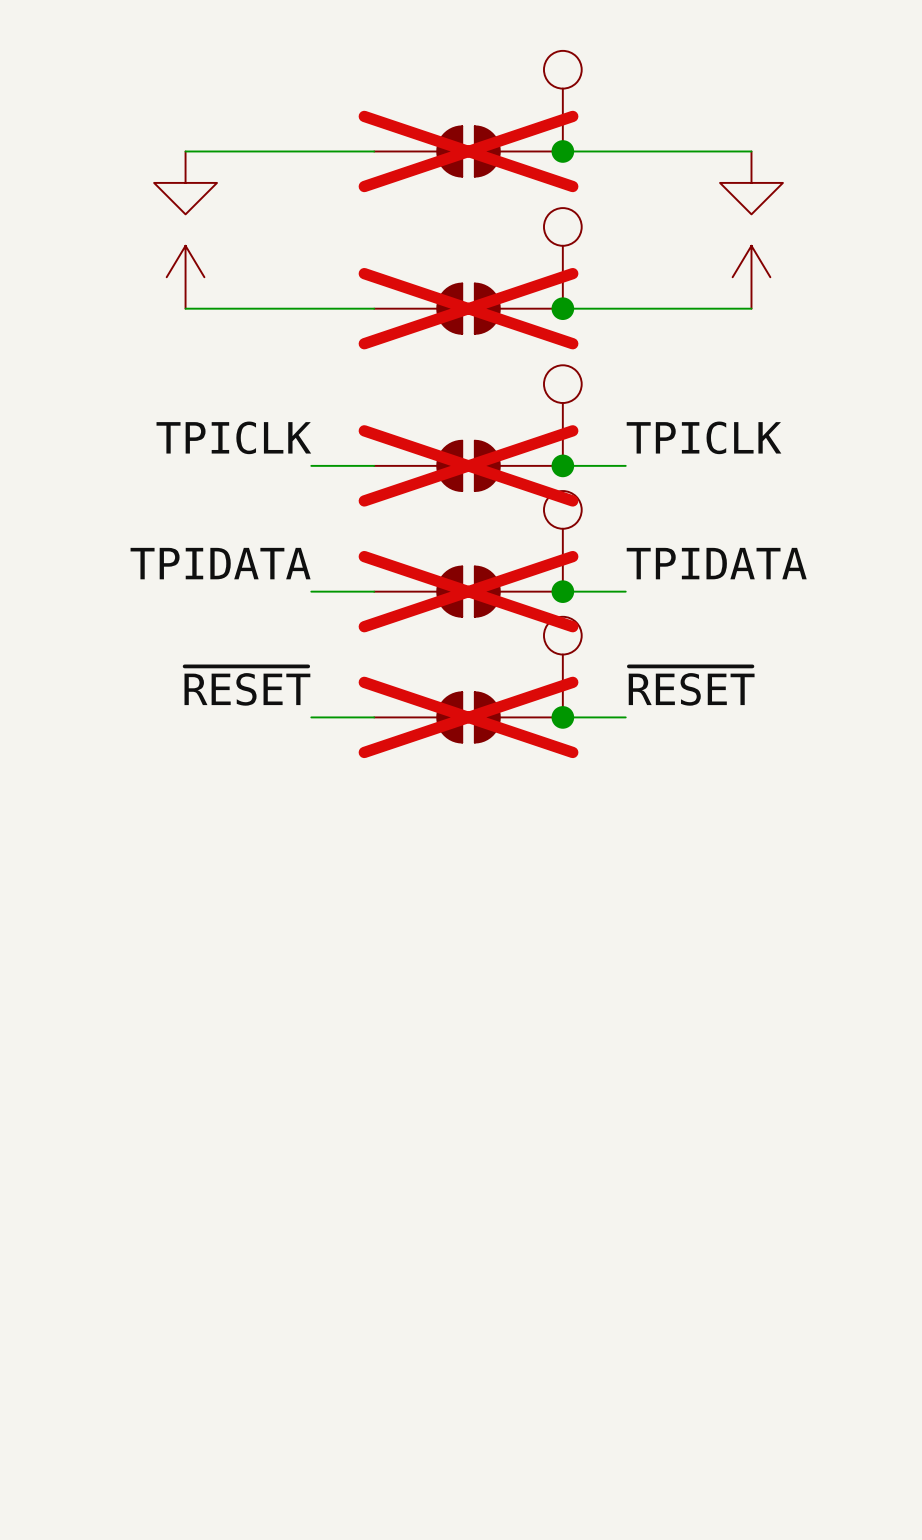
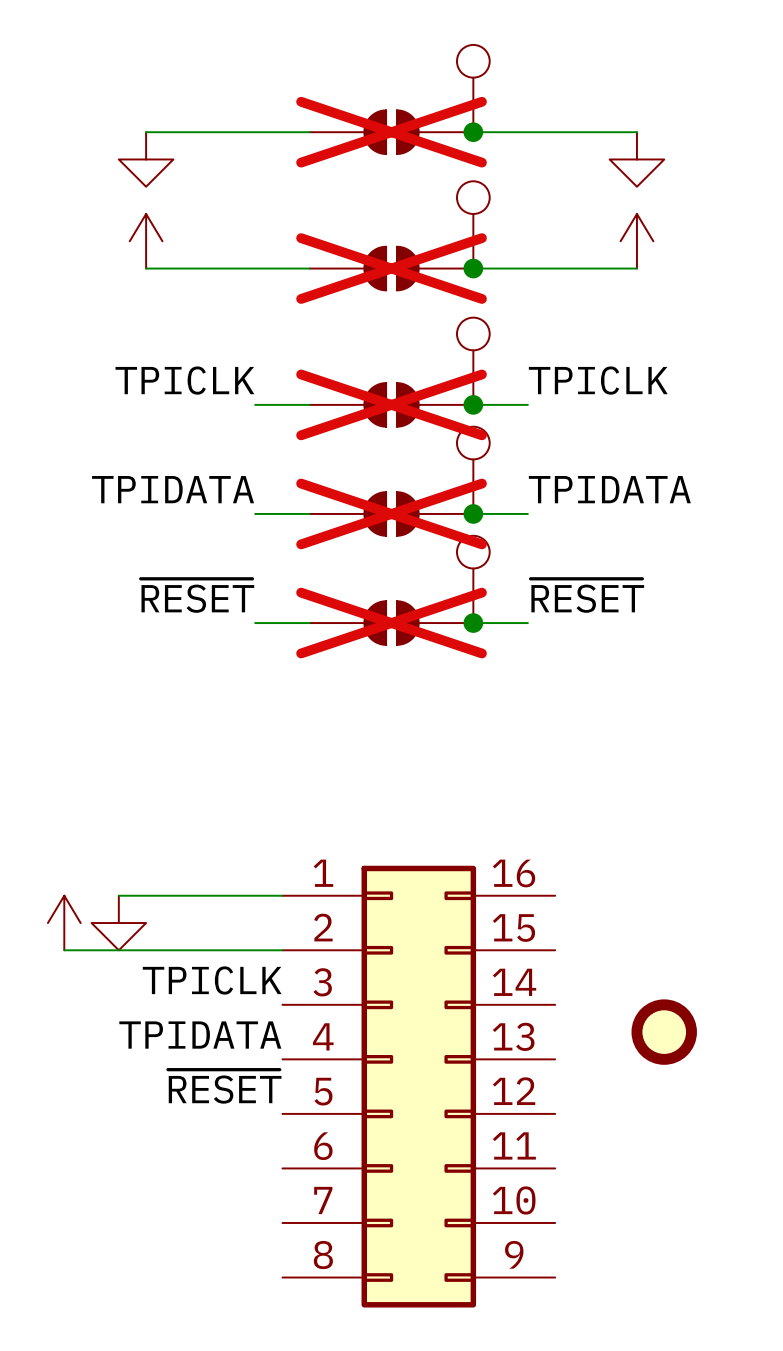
wire: none -> (118, 895) (282, 895)
power symbol: none -> (64, 923)
power symbol: none -> (118, 923)
wire: none -> (64, 950) (282, 950)
label: none -> TPICLK (212, 980)
part: none -> (664, 1032)
label: none -> TPIDATA (200, 1035)
label: none -> ~{RESET} (224, 1086)
part: none -> (418, 1086)

